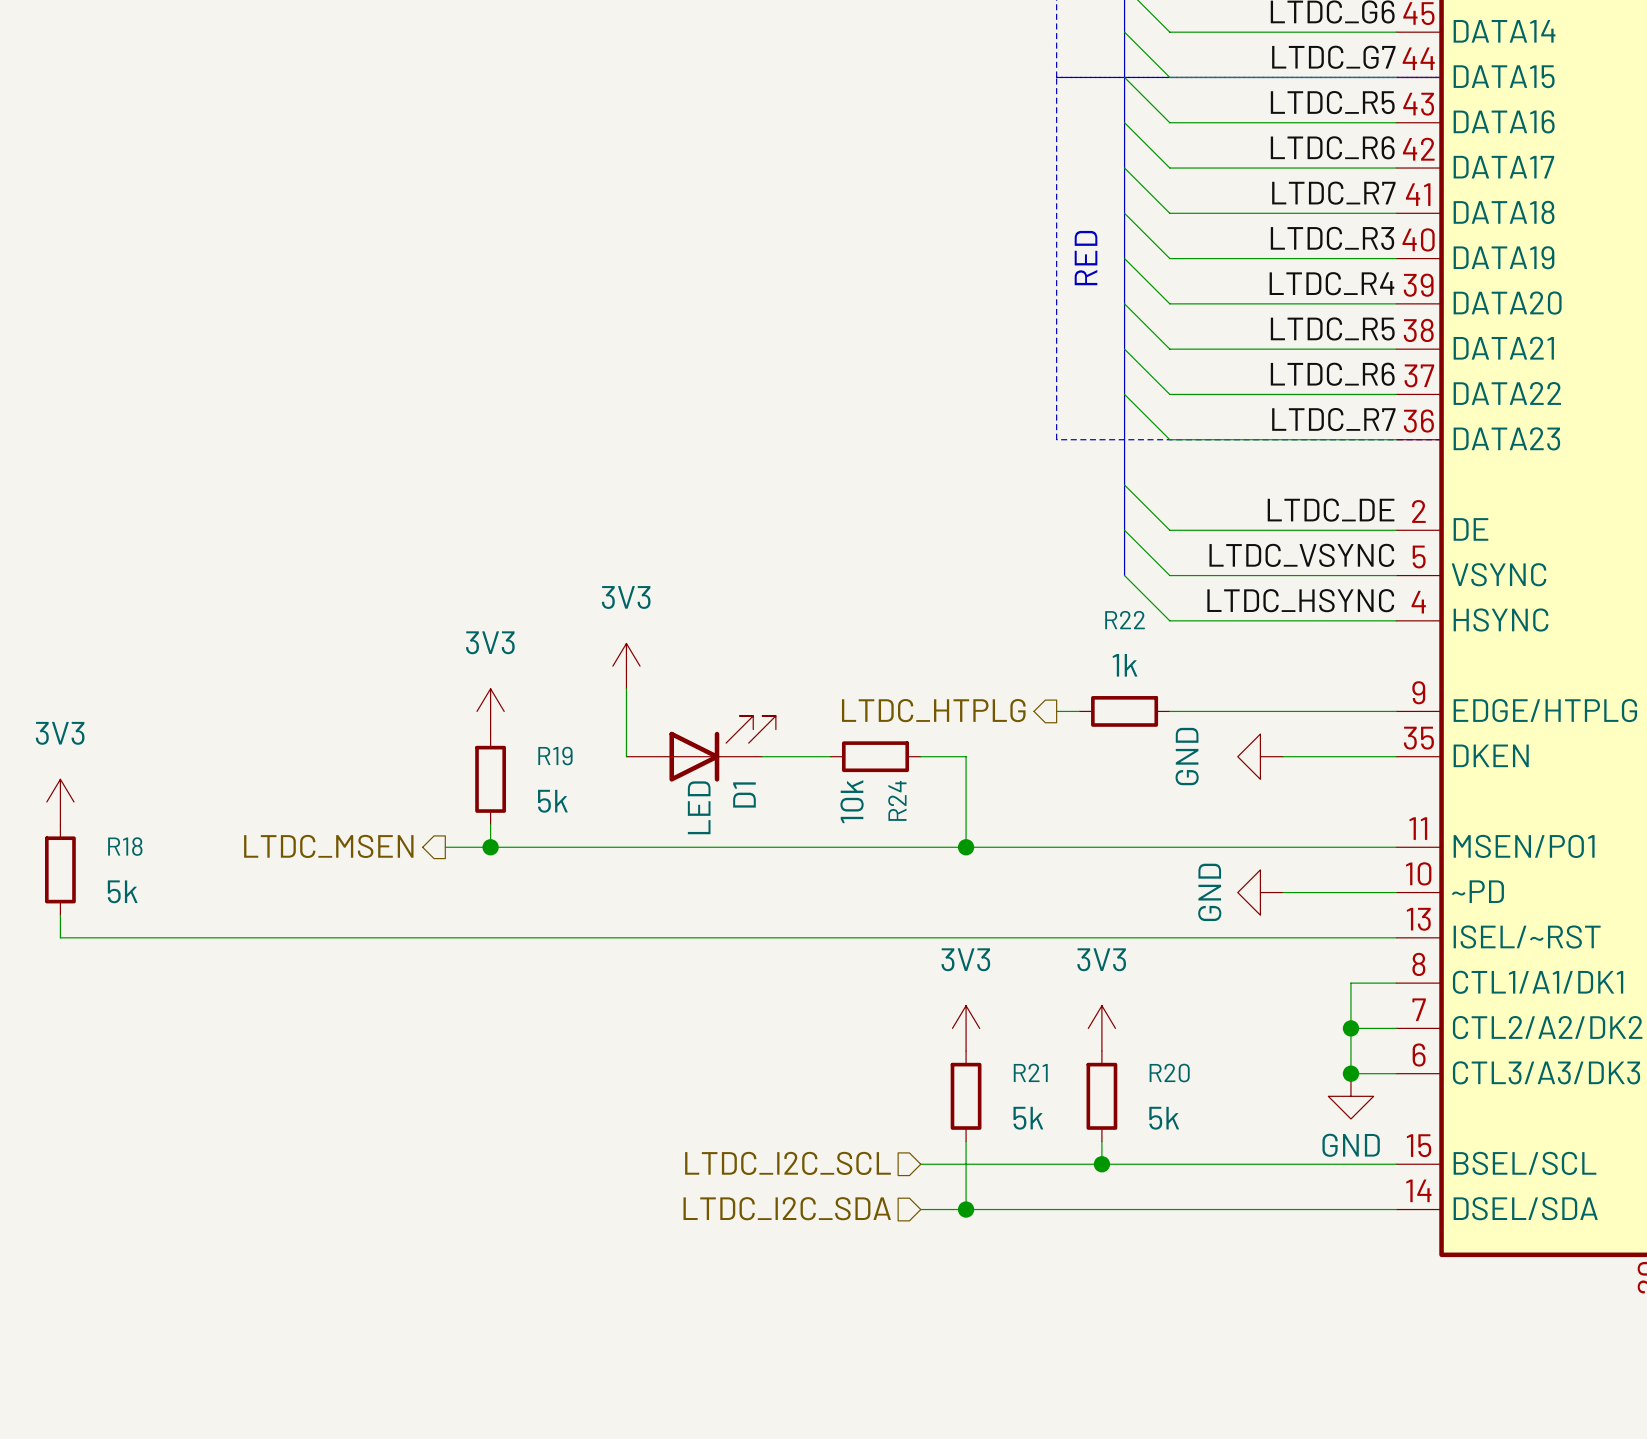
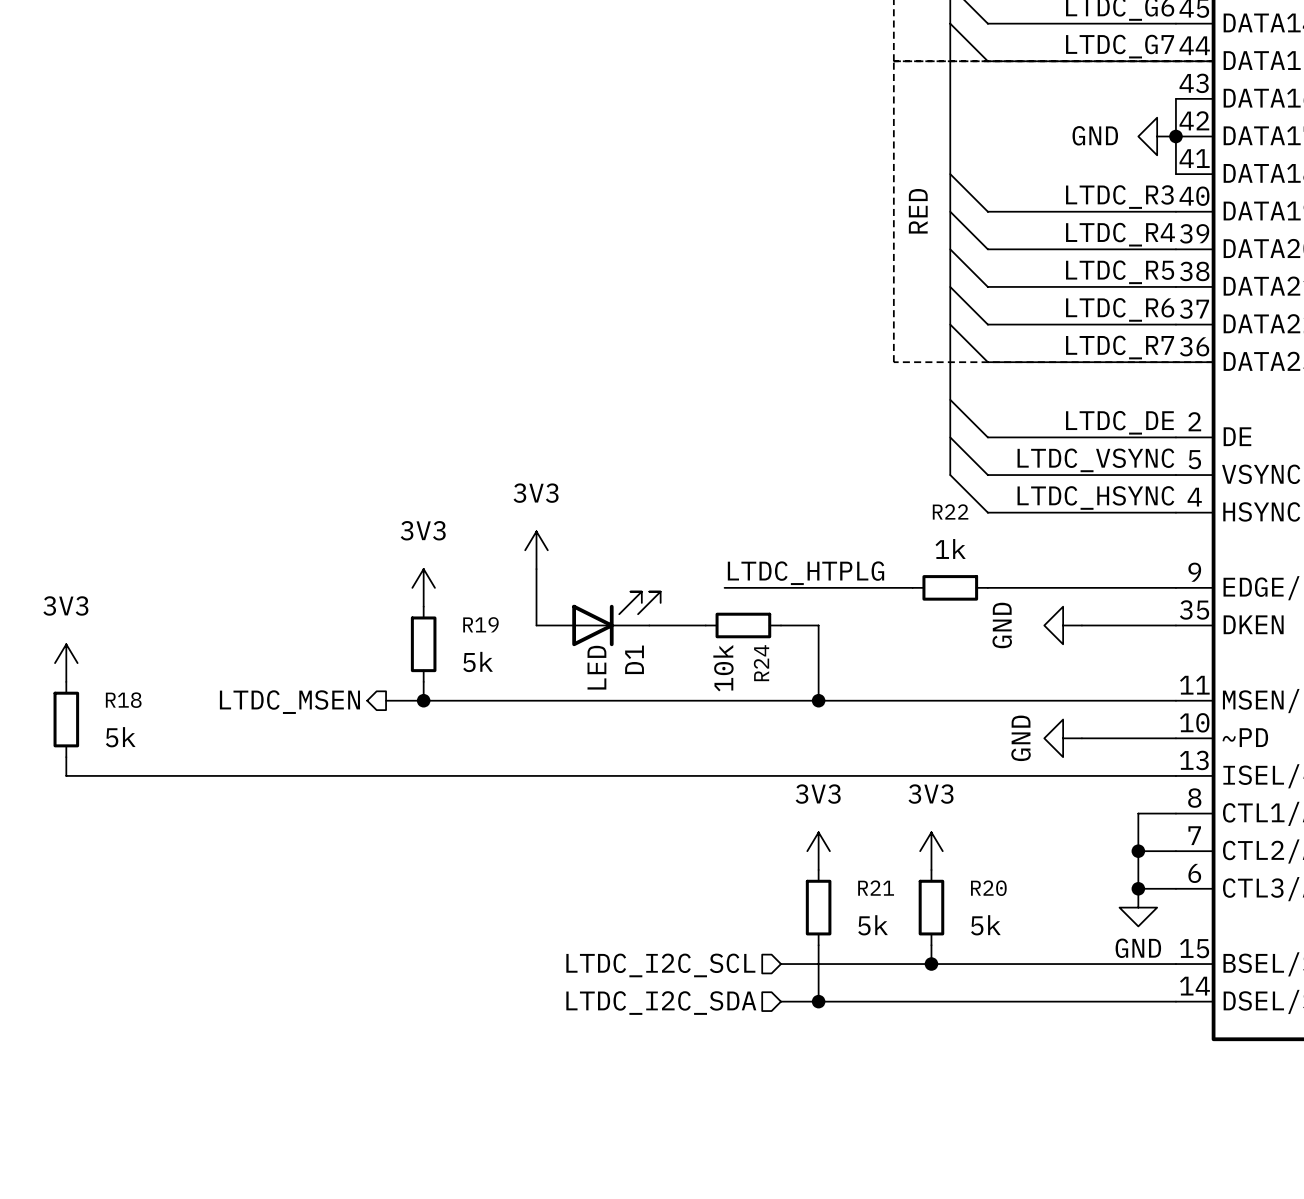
wire: (1124, 77) (1169, 122) (1396, 122) -> none
label: LTDC_R5 (1332, 102) -> none
wire: (1124, 122) (1169, 168) (1396, 168) -> none
label: LTDC_R6 (1332, 147) -> none
wire: (1124, 168) (1169, 213) (1396, 213) -> (1175, 98) (1175, 174)
power symbol: none -> GND (1157, 136)
junction: none -> (1175, 136)
label: LTDC_R7 (1333, 193) -> none
label: none -> LTDC_HTPLG (805, 573)
hierarchical label: LTDC_HTPLG (933, 710) -> none
wire: none -> (724, 587) (893, 587)

